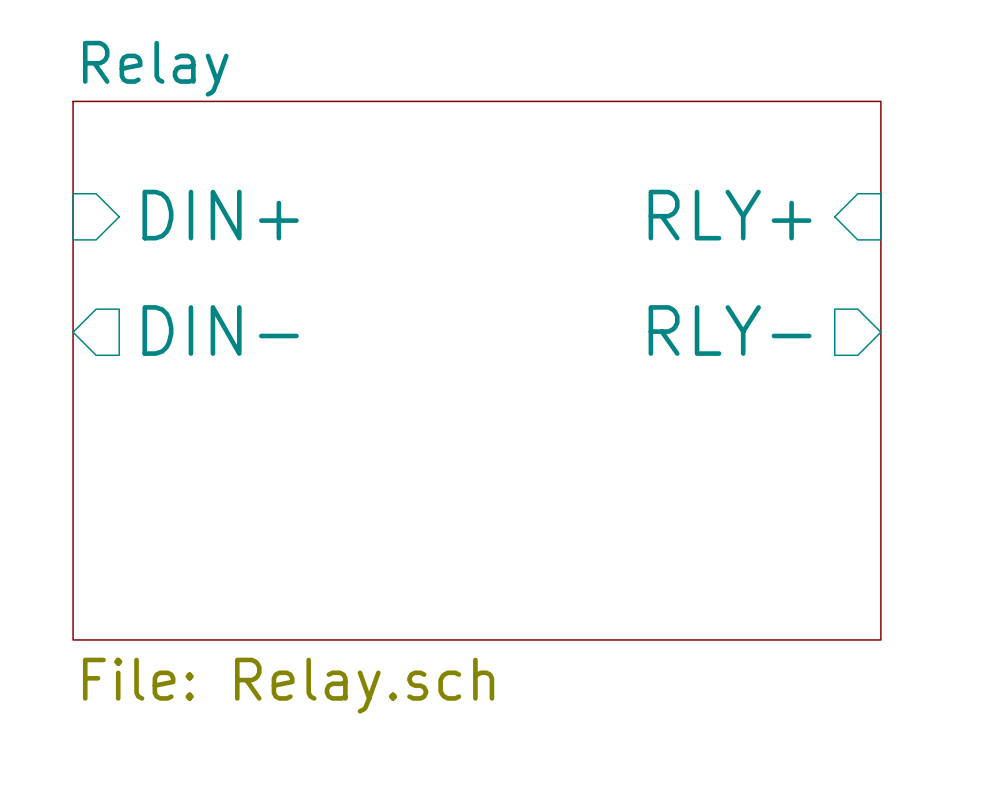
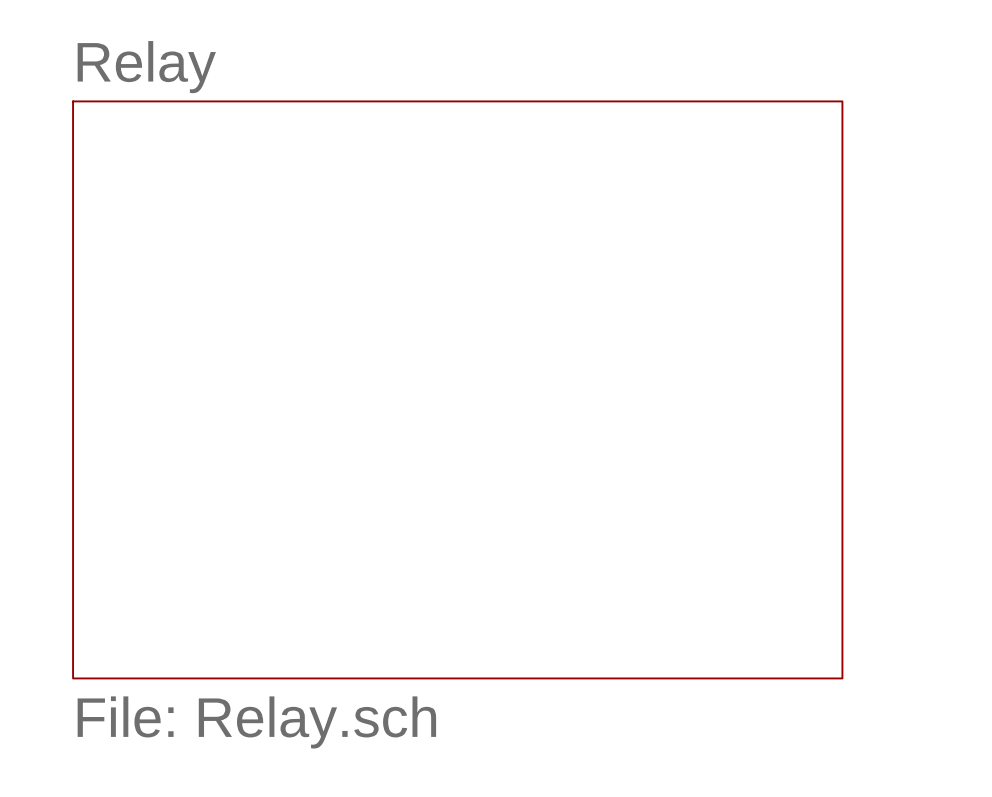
sheet Relay shape: [73, 101, 881, 640] -> [73, 101, 843, 679]
sheet pin: DIN+ (220, 215) -> none
sheet pin: RLY+ (730, 215) -> none
sheet pin: DIN- (220, 330) -> none
sheet pin: RLY- (730, 330) -> none

